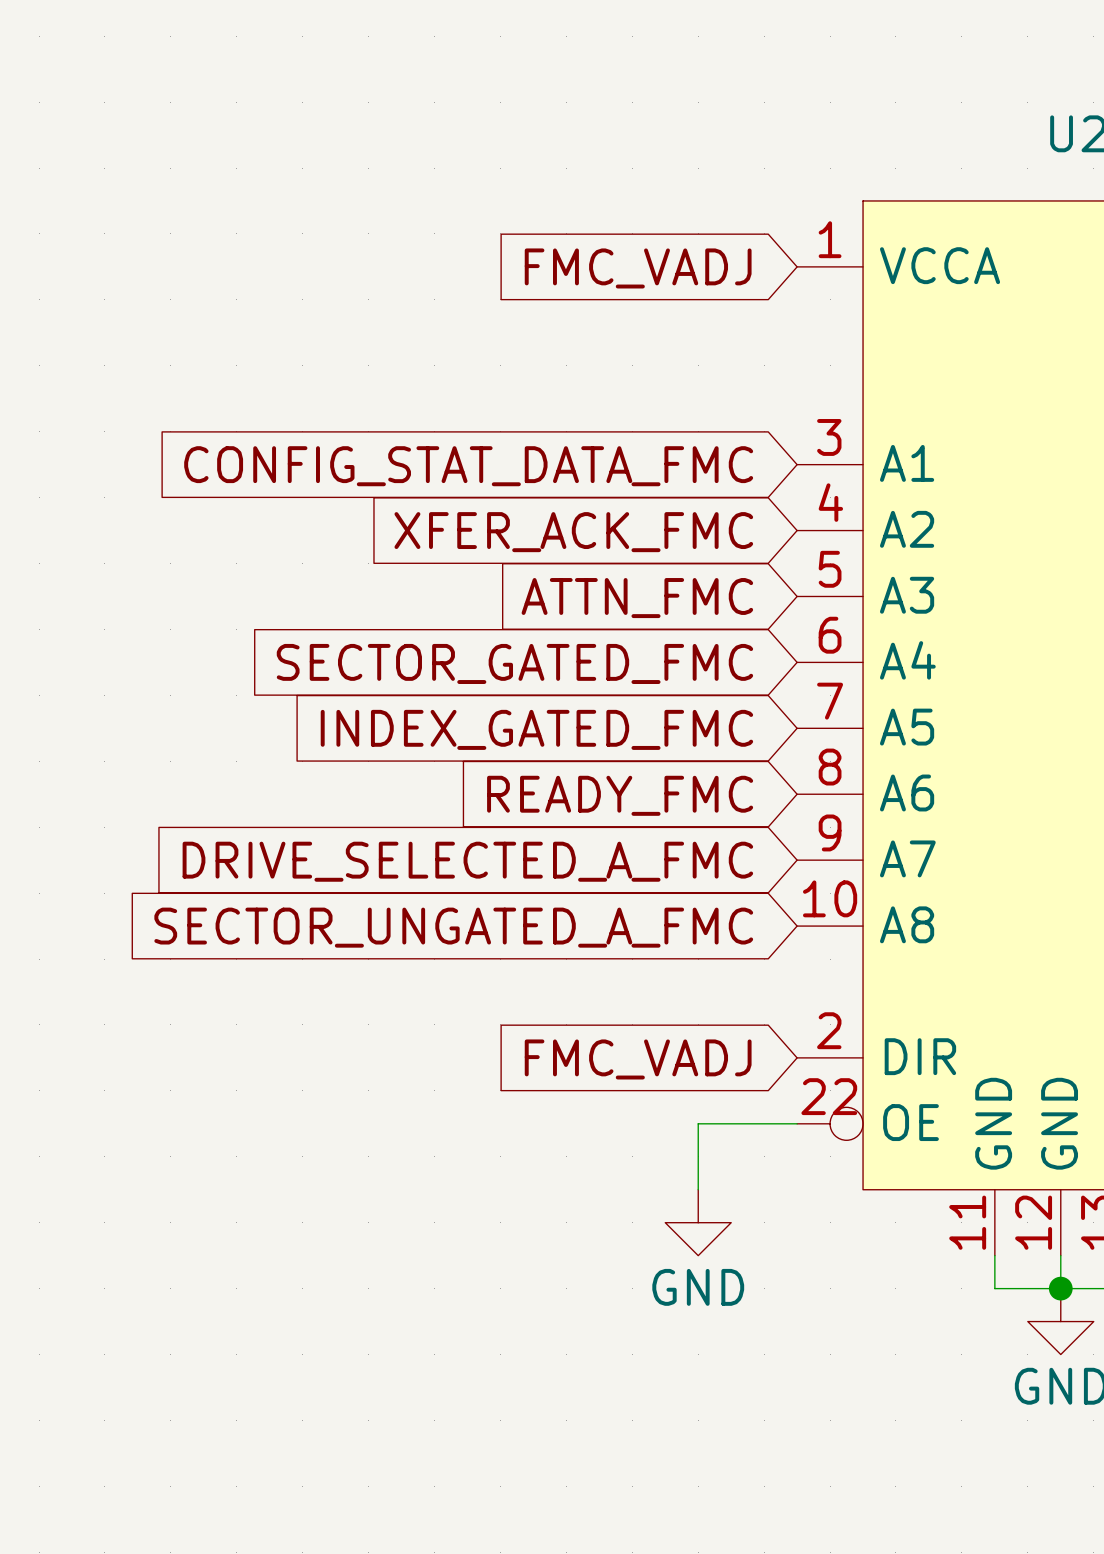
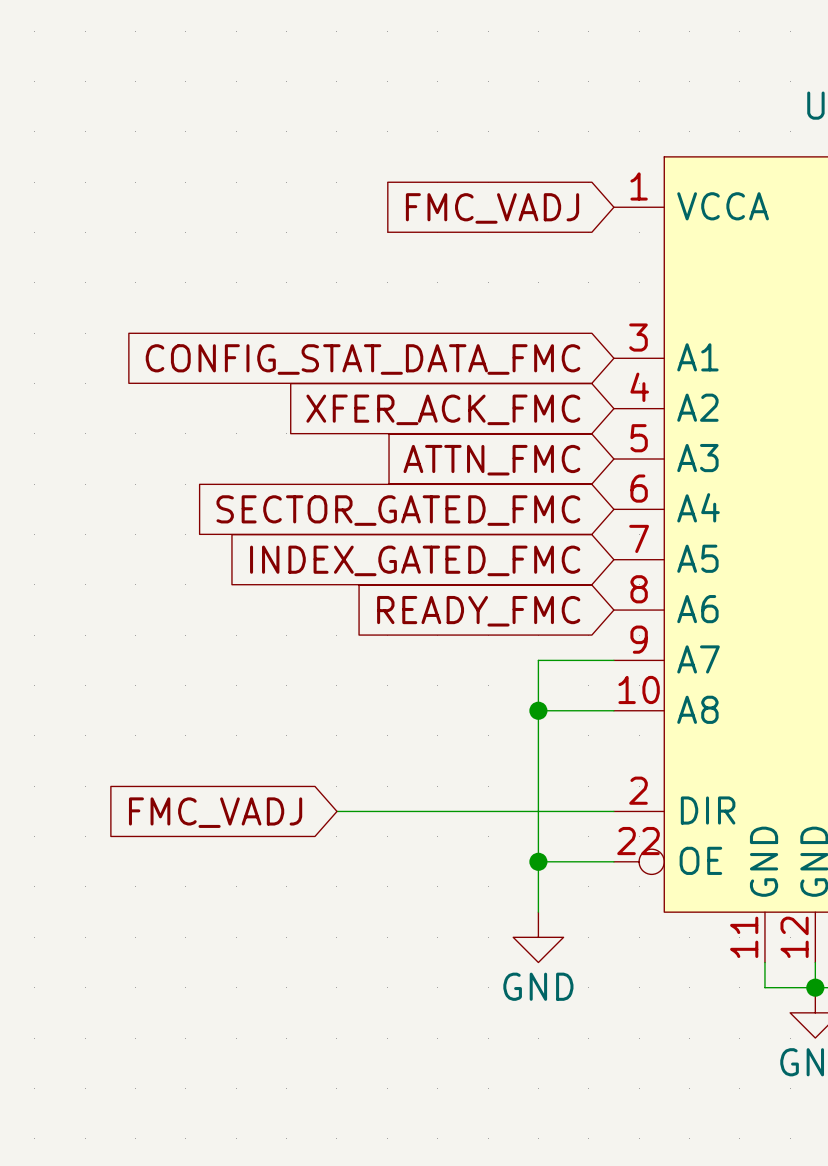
wire: none -> (613, 660) (538, 660) (538, 861)
global label: DRIVE_SELECTED_A_FMC (467, 861) -> none
wire: none -> (538, 710) (613, 710)
junction: none -> (538, 710)
global label: SECTOR_UNGATED_A_FMC (453, 927) -> none
wire: none -> (336, 811) (613, 811)
global label position: FMC_VADJ (638, 1059) -> FMC_VADJ (215, 812)
junction: none -> (538, 861)

